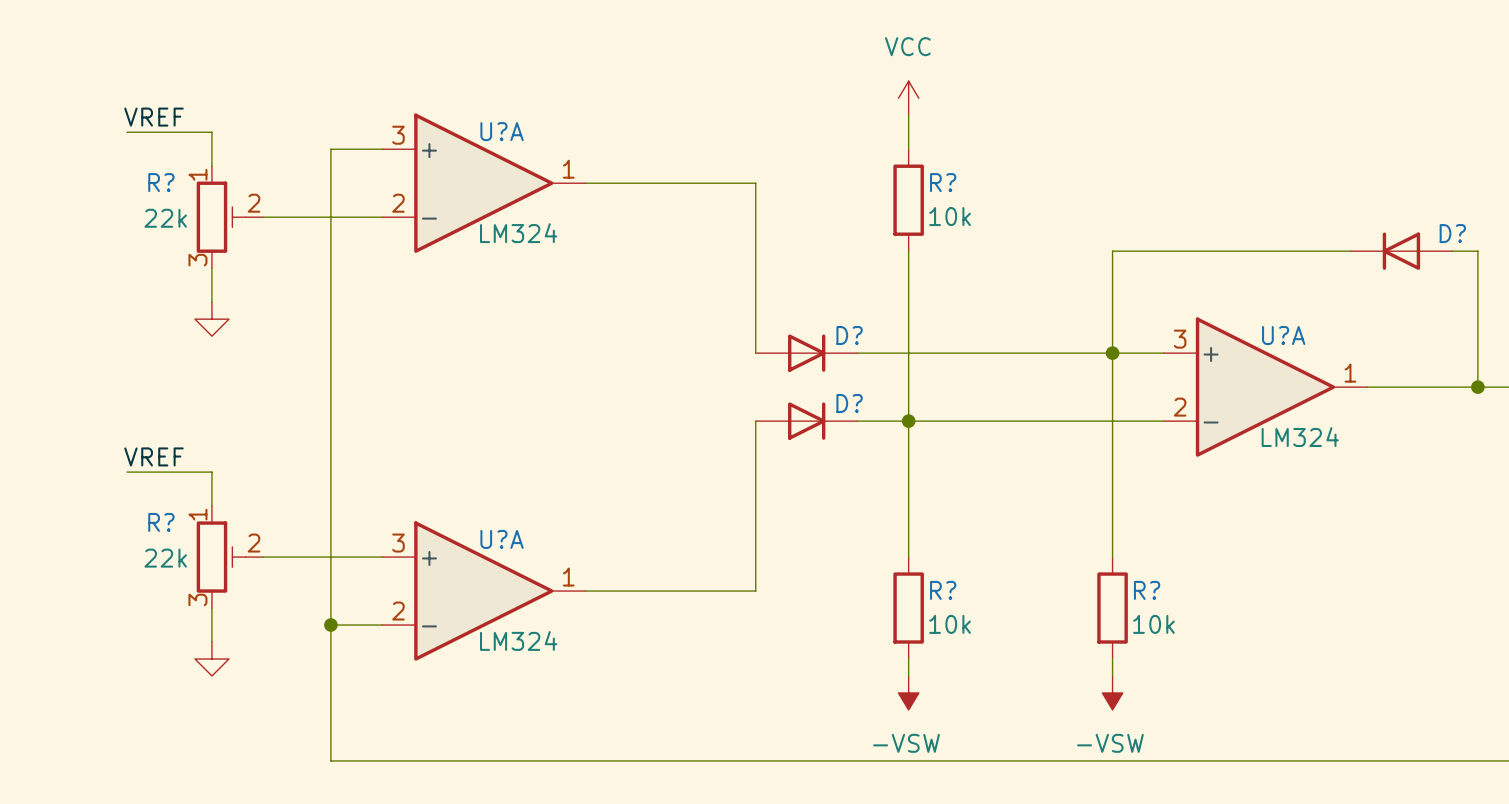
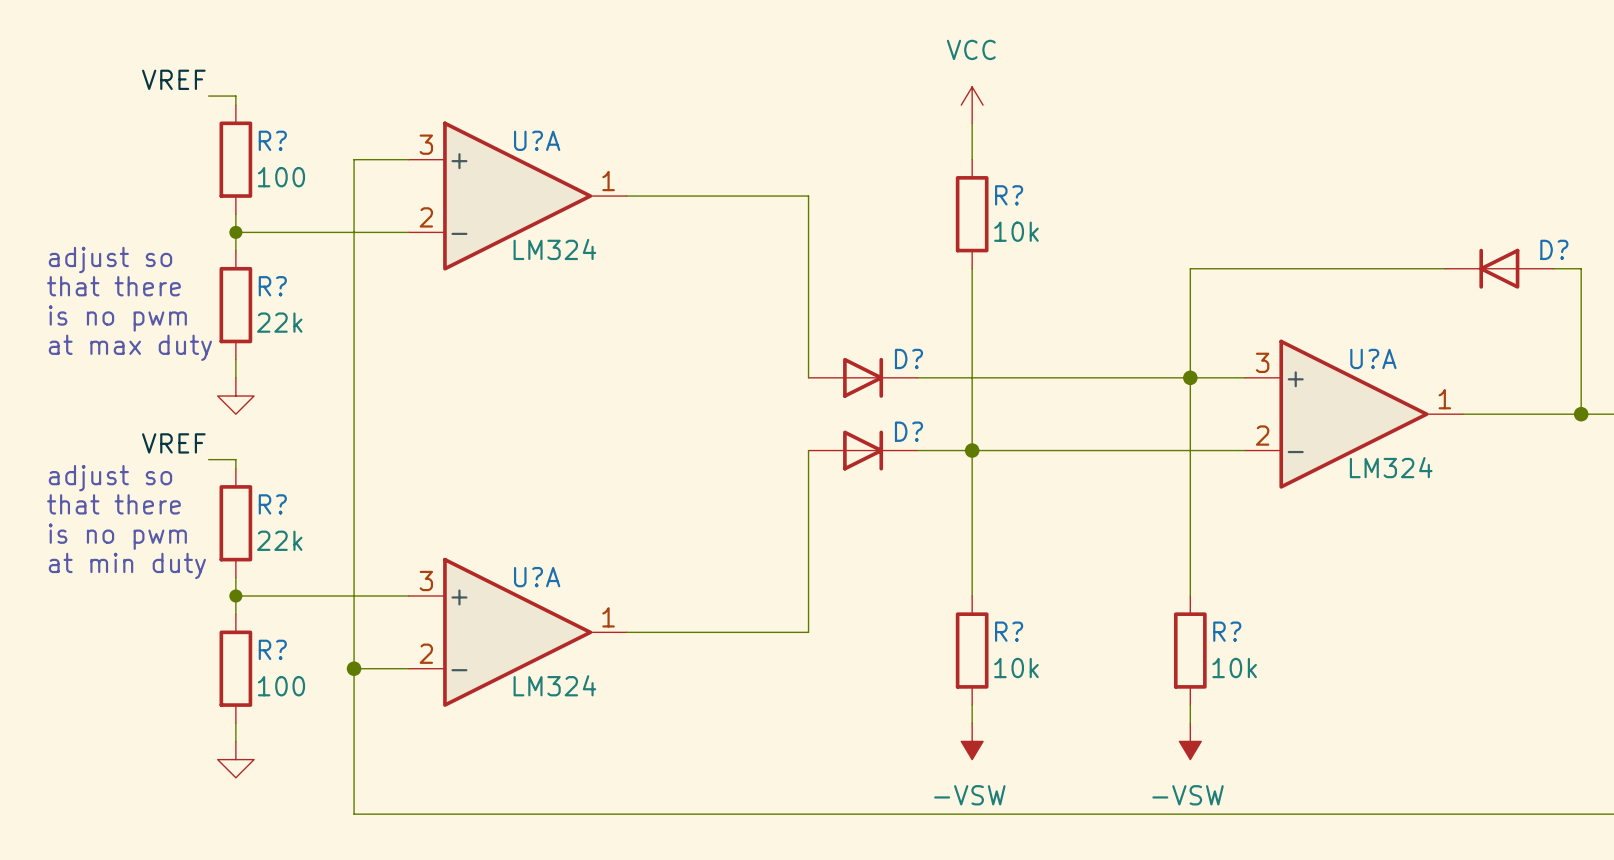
wire: none -> (208, 96) (235, 96) (235, 105)
label position: VREF (153, 117) -> VREF (173, 79)
wire: (127, 132) (211, 132) (211, 166) -> none
R?: none -> 100 (235, 159)
junction: none -> (235, 232)
R?: 22k (229, 217) -> none
text: none -> adjust so (110, 259)
text: none -> that there (113, 286)
wire: (211, 268) (211, 302) -> (235, 214) (235, 250)
R?: none -> 22k (235, 305)
text: none -> is no pwm (117, 318)
power symbol position: (211, 319) -> (235, 396)
text: none -> at max duty (130, 347)
wire: none -> (235, 359) (235, 377)
wire: none -> (208, 459) (235, 459) (235, 468)
text: none -> adjust so (110, 478)
label position: VREF (153, 456) -> VREF (173, 443)
text: none -> that there (113, 504)
wire: (127, 472) (211, 472) (211, 506) -> none
R?: none -> 22k (235, 523)
text: none -> is no pwm (117, 536)
text: none -> at min duty (127, 565)
junction: none -> (235, 595)
R?: 22k (229, 557) -> none
wire: (211, 608) (211, 642) -> (235, 577) (235, 614)
R?: none -> 100 (235, 668)
power symbol position: (211, 659) -> (235, 759)
wire: none -> (235, 723) (235, 741)

